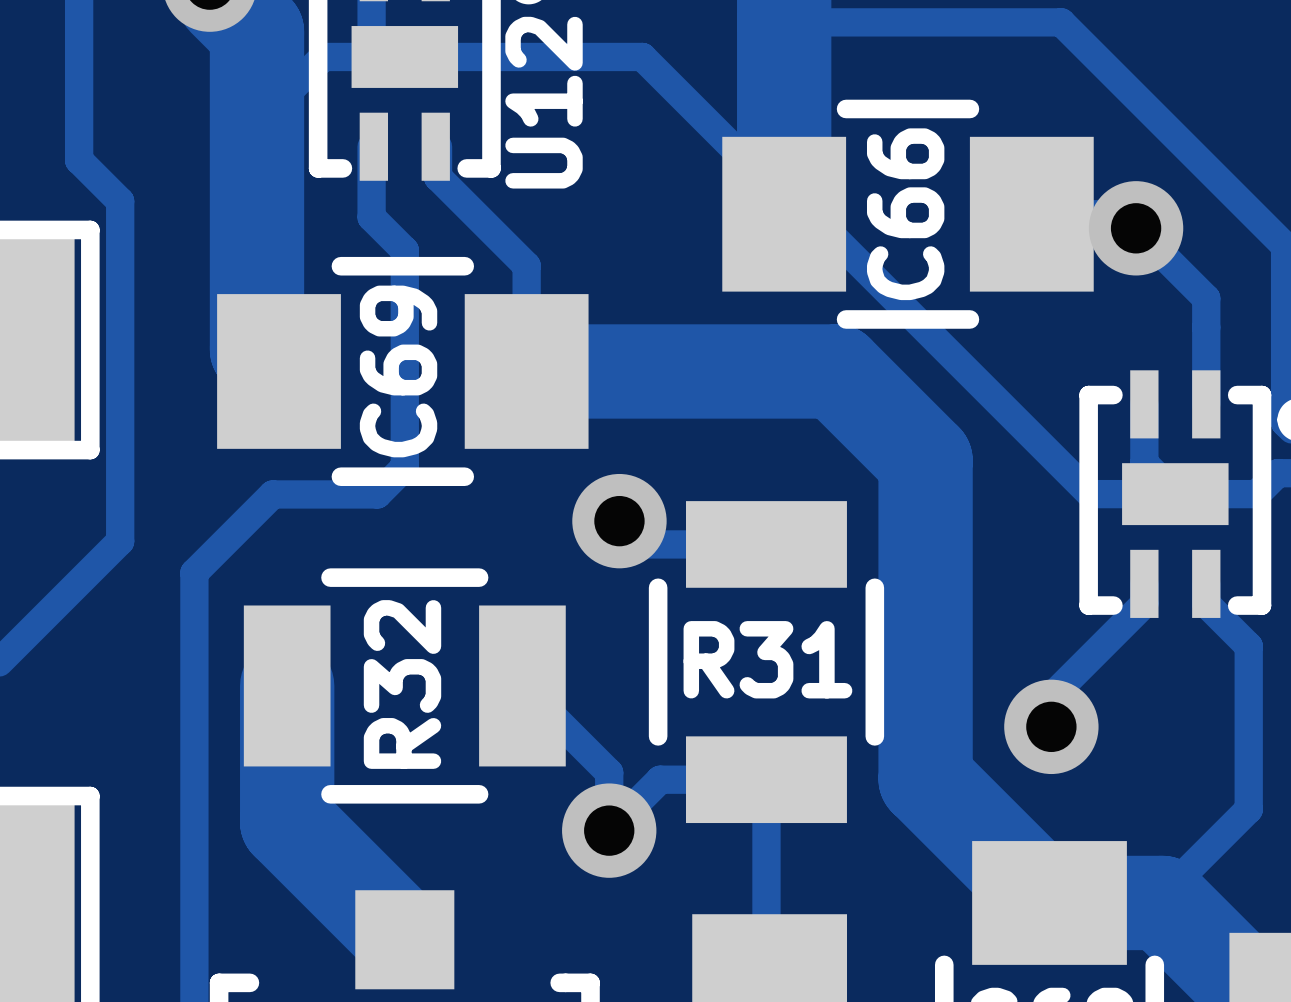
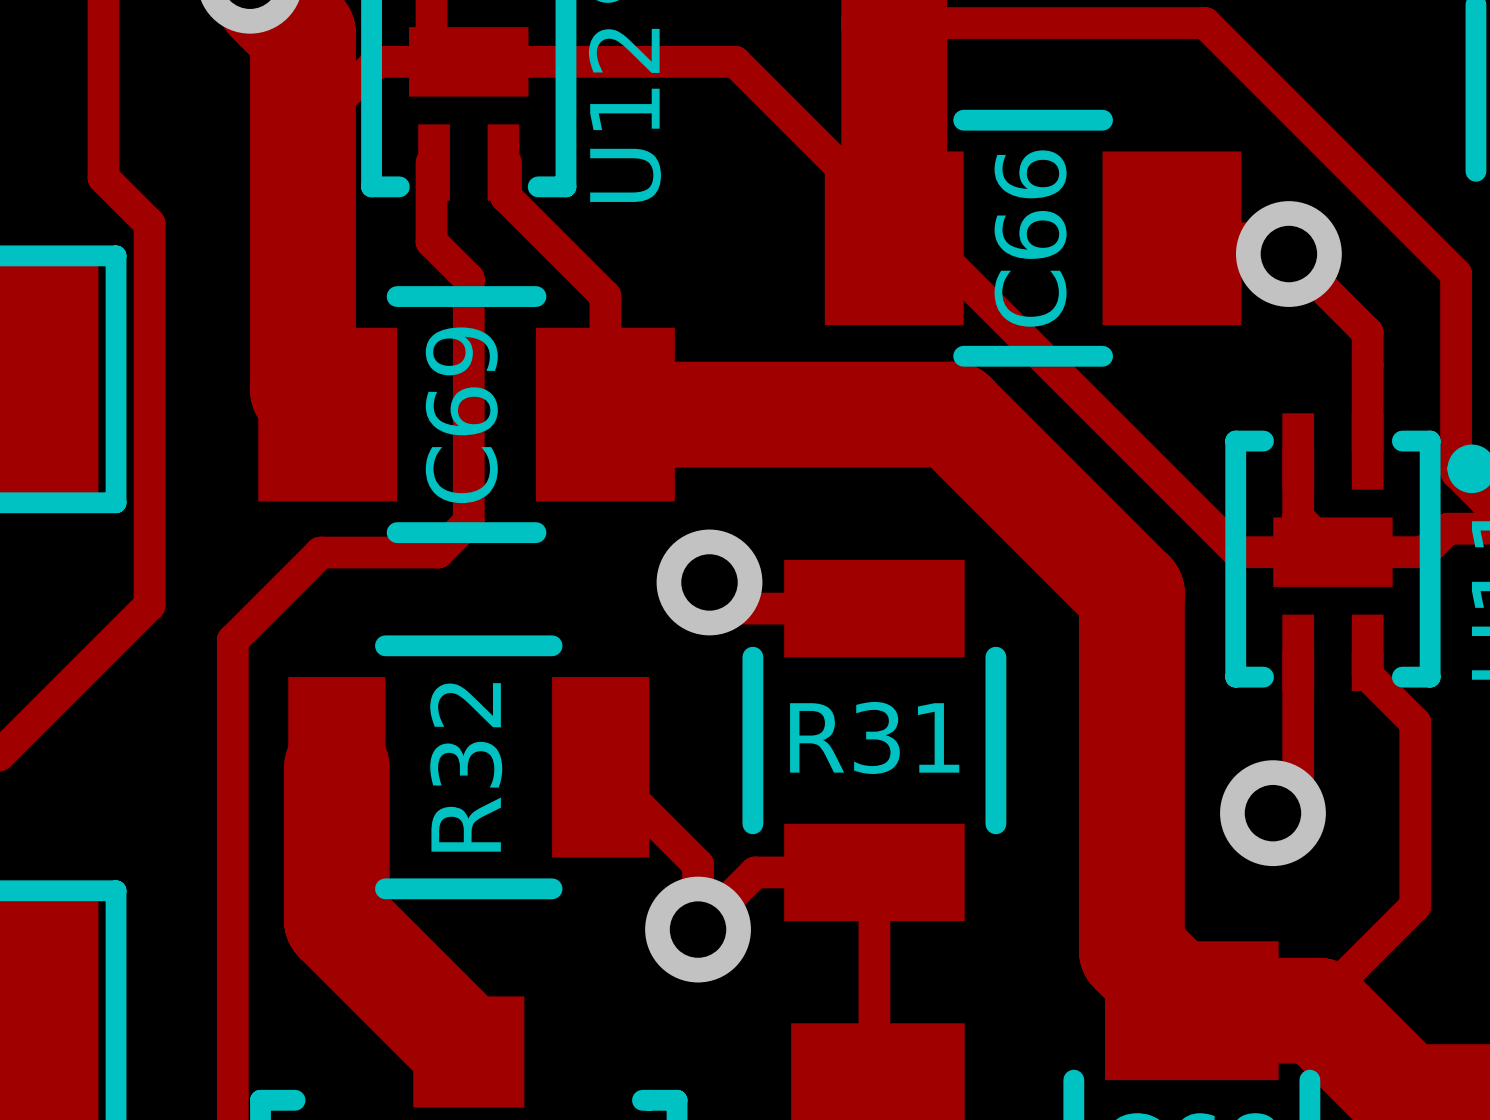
track: (925, 460) (925, 779) (996, 849) -> (1052, 514) (1131, 593) (1131, 950)
track: (1144, 603) (1051, 696) (1051, 726) -> (1298, 675) (1298, 787) (1272, 813)
via position: (1051, 726) -> (1272, 813)

